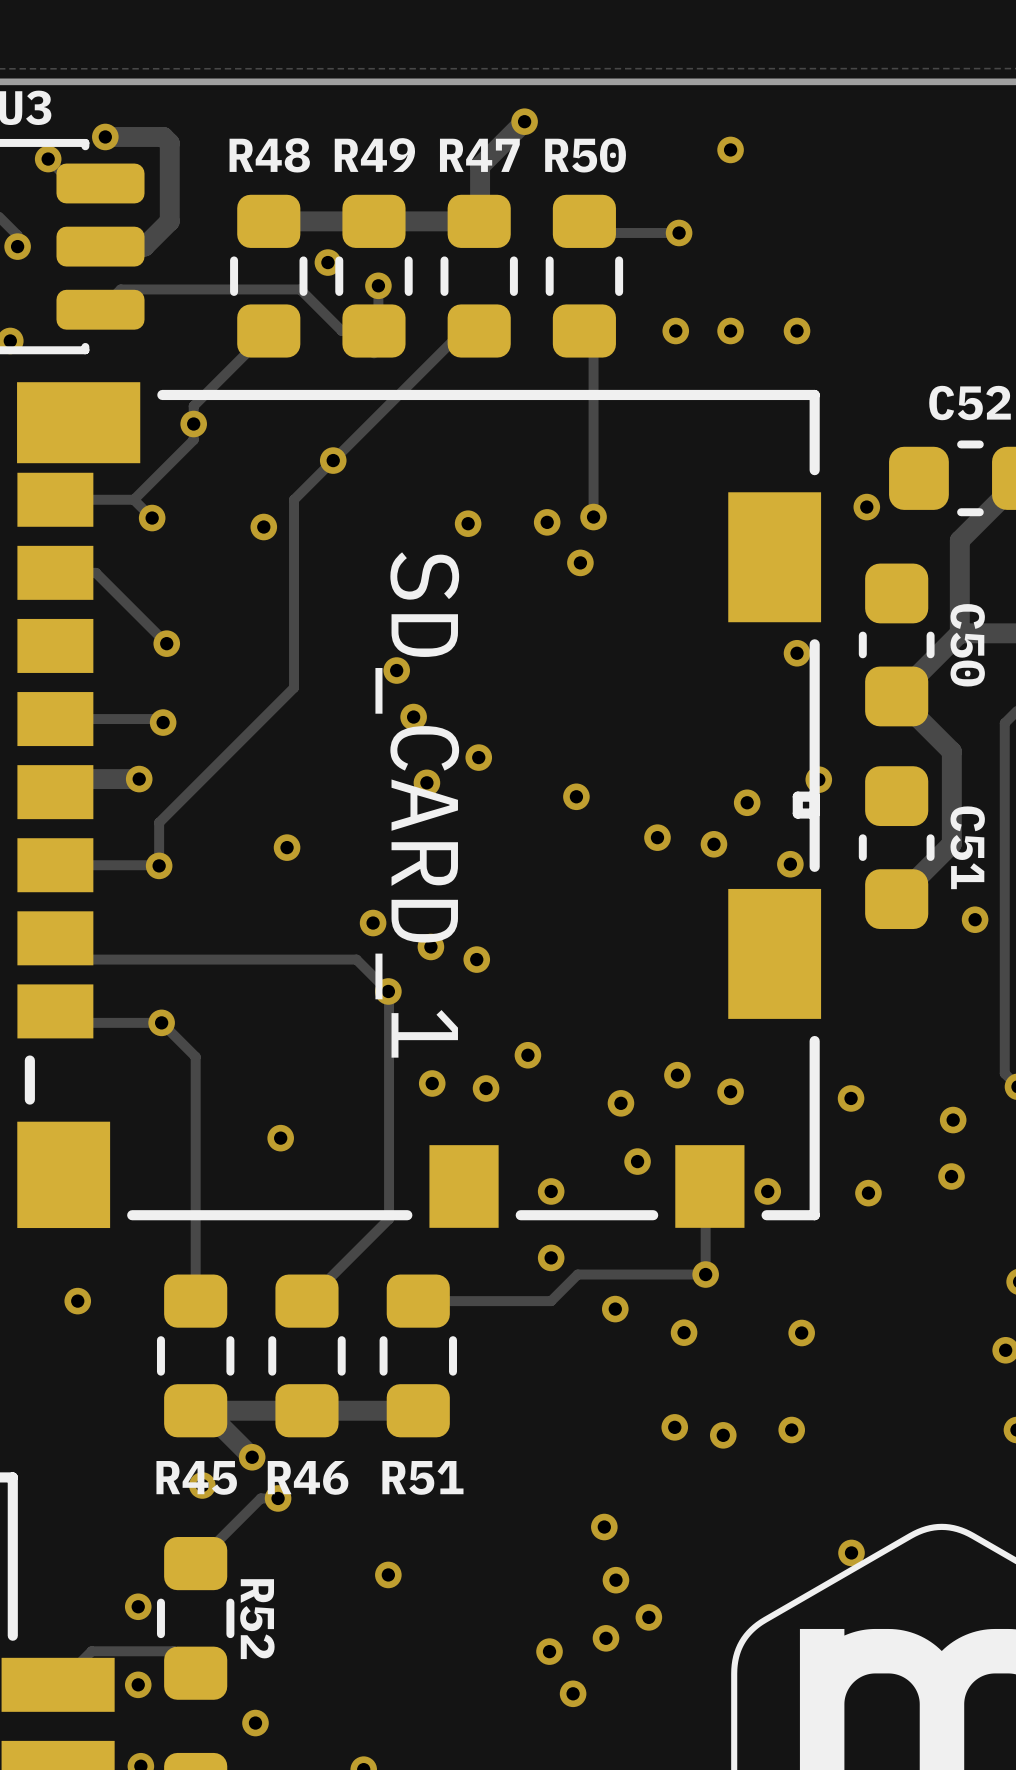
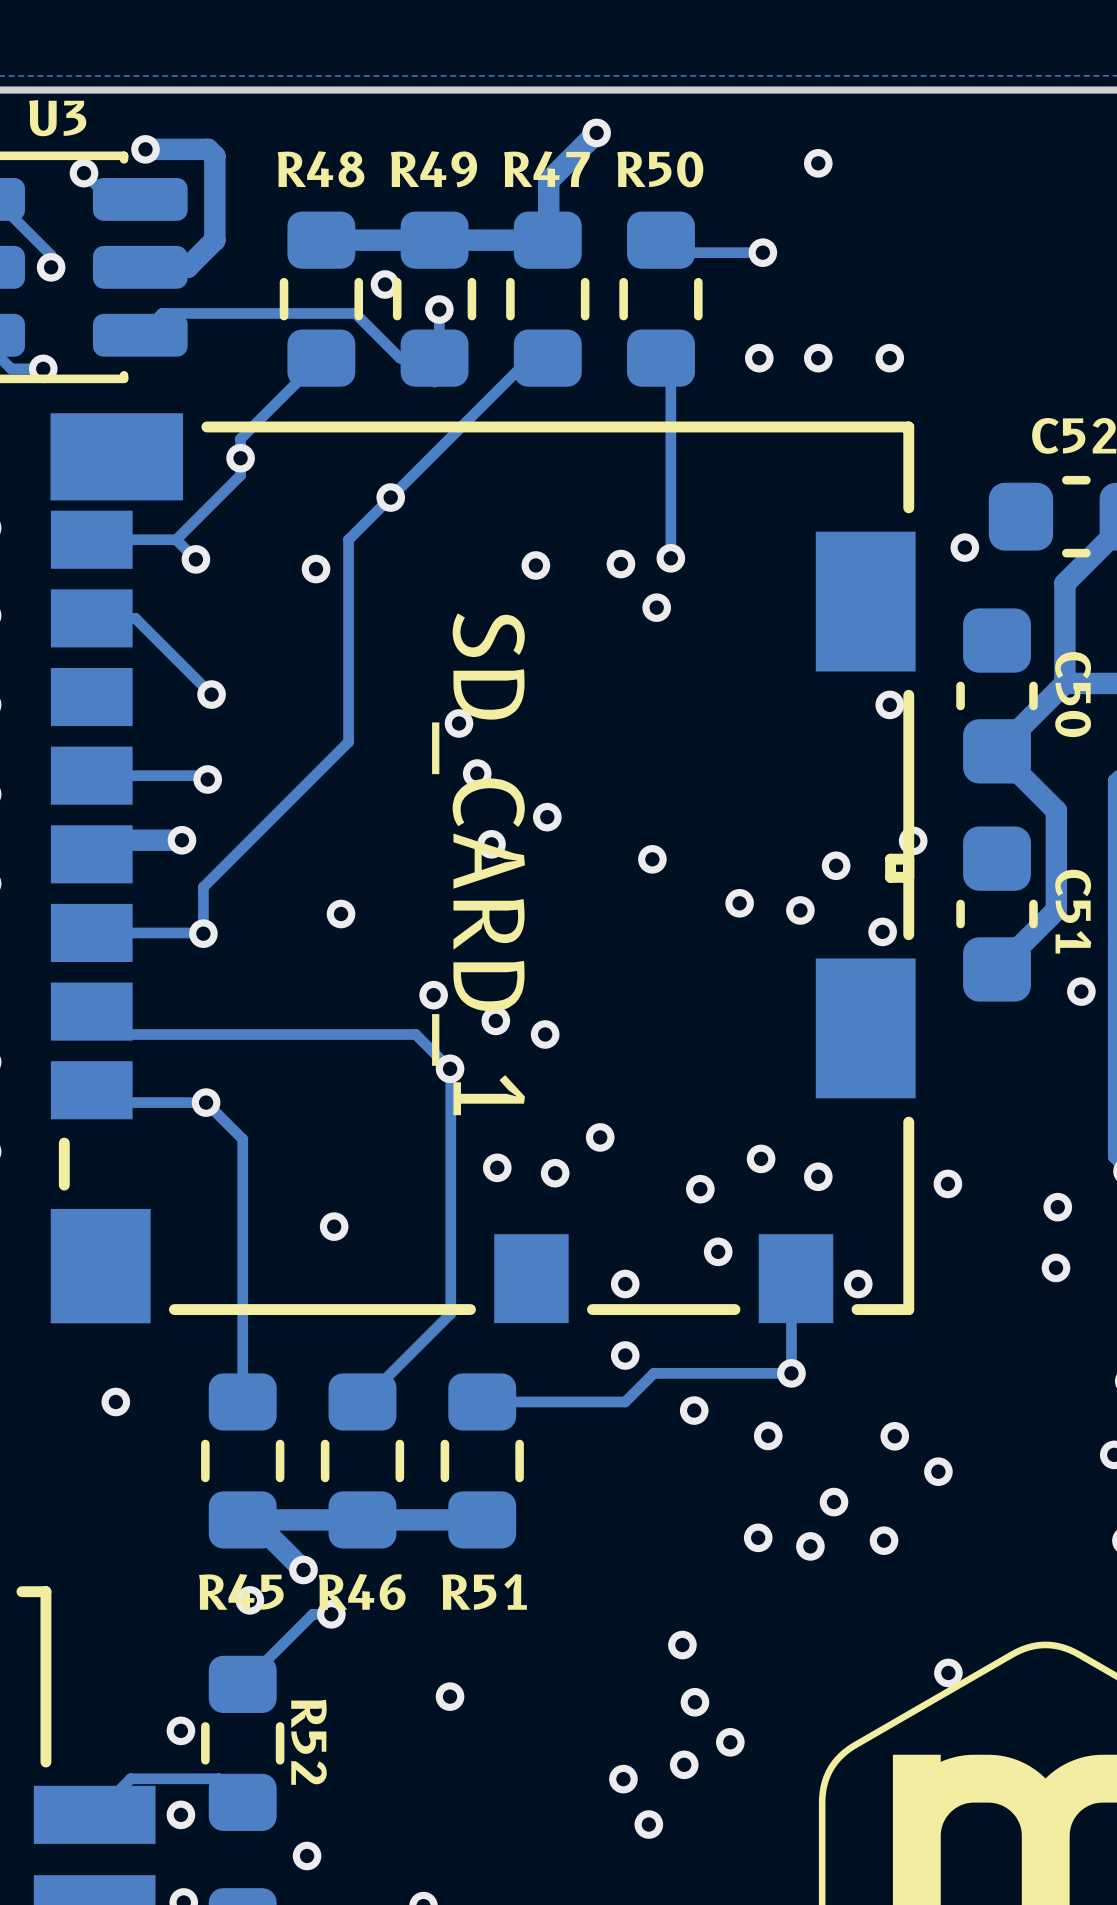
via: (868, 1193) -> none
via: none -> (938, 1471)
via: none -> (834, 1502)

